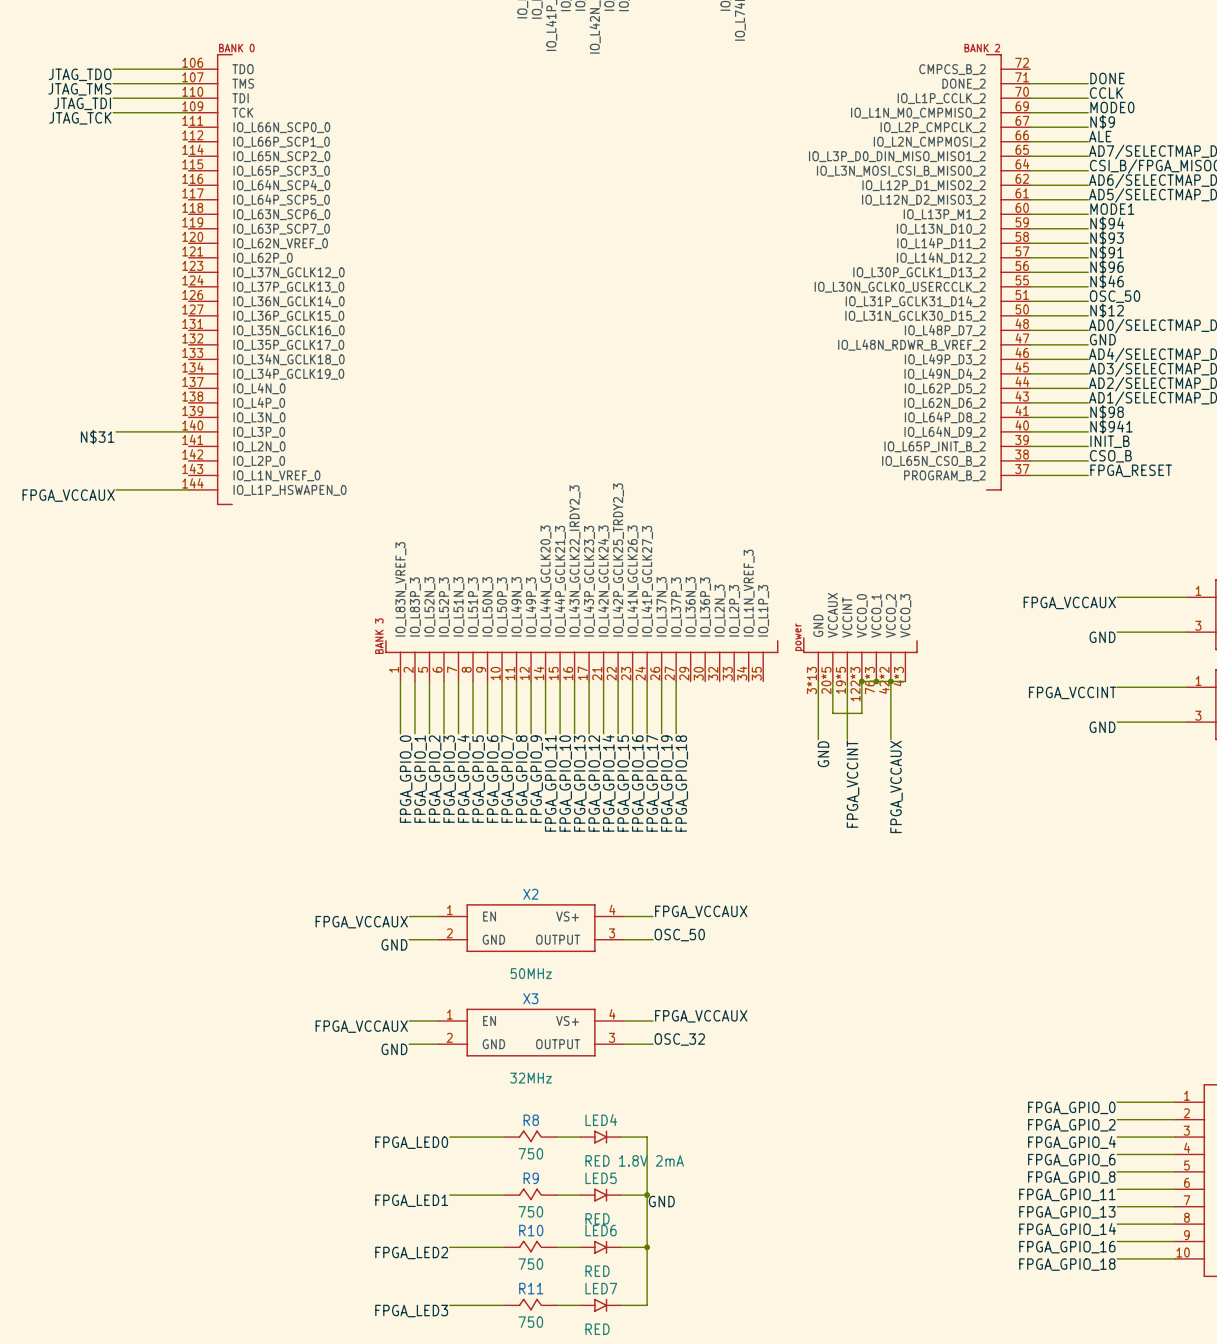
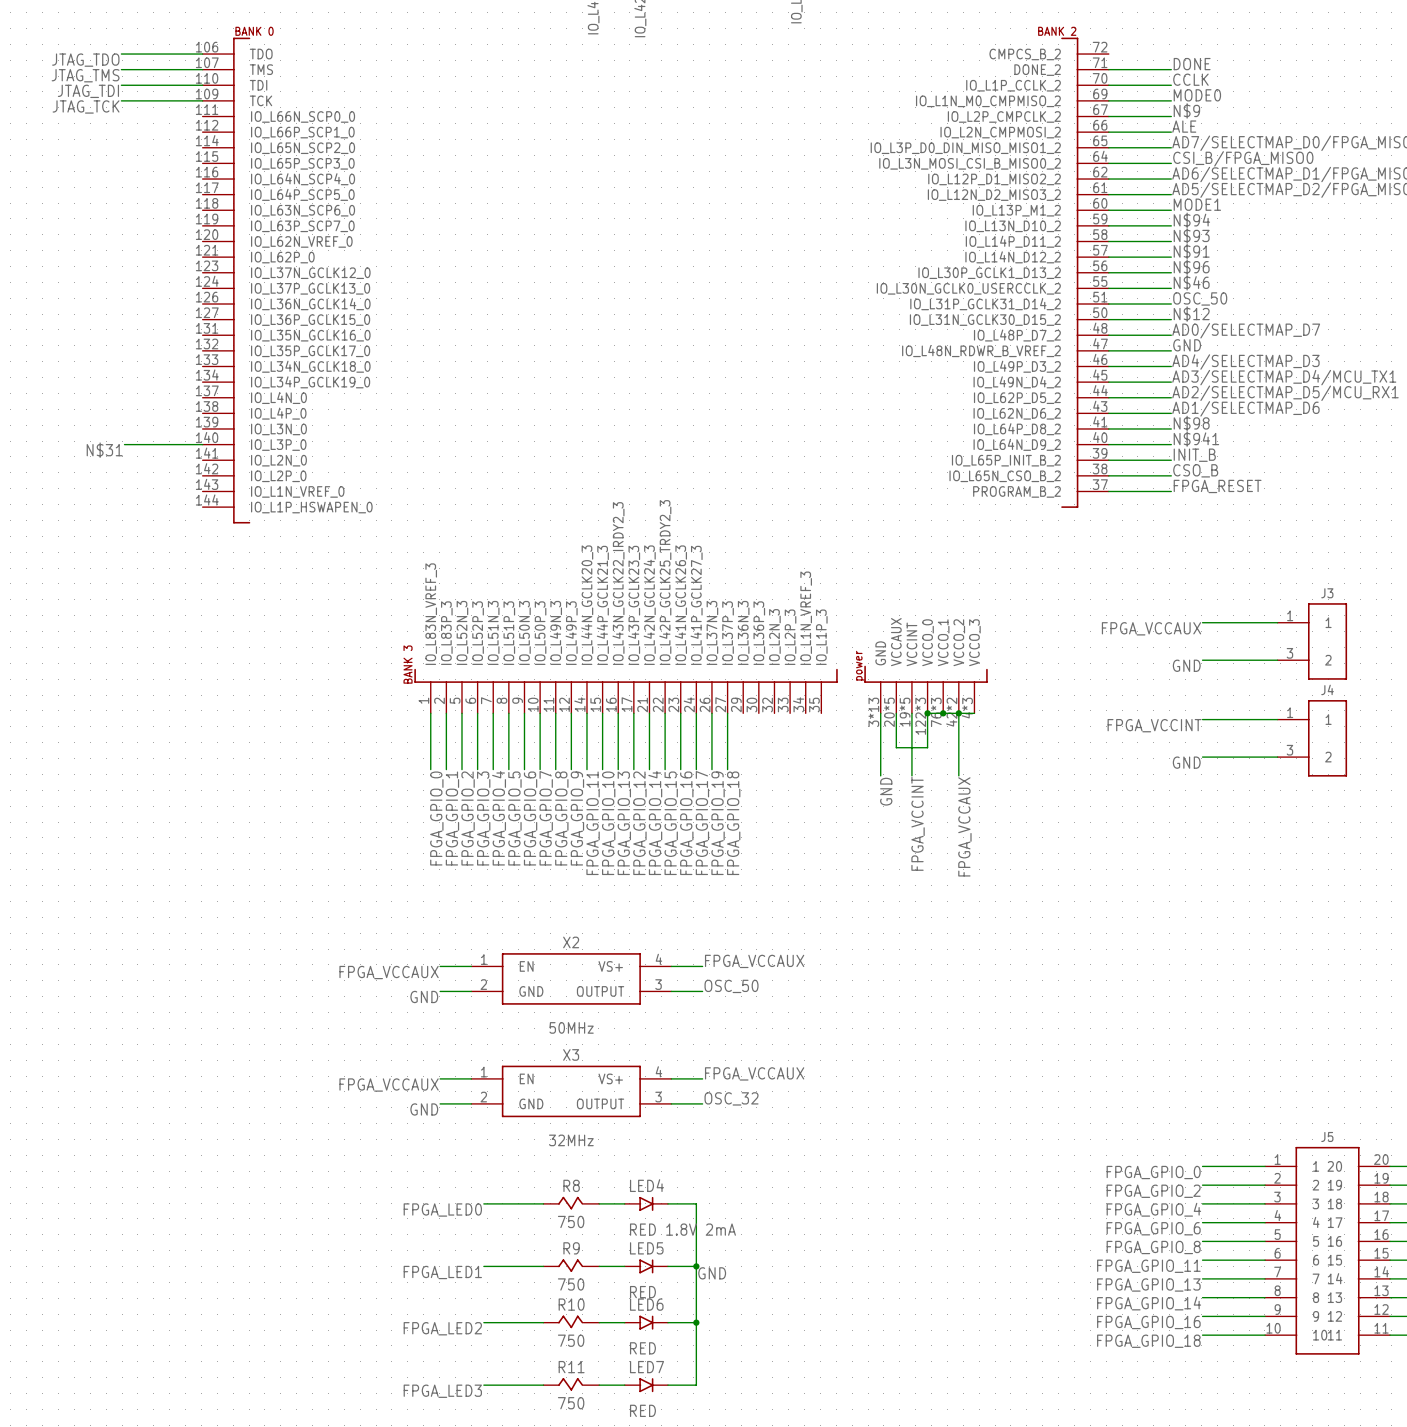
wire: (116, 489) (188, 489) -> none
label: FPGA_VCCAUX (68, 495) -> none

